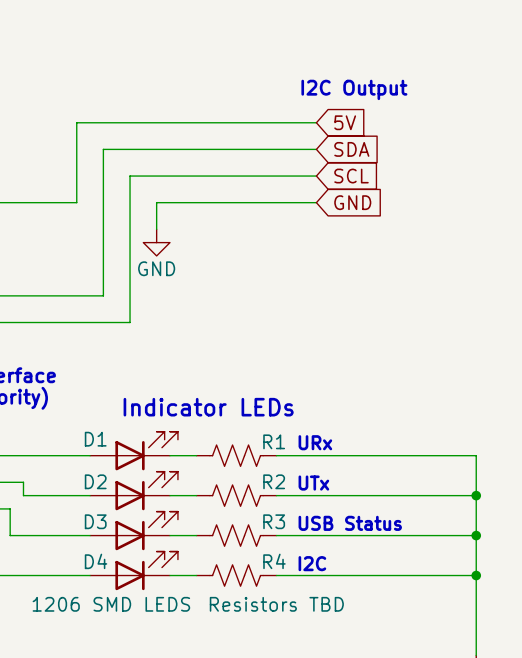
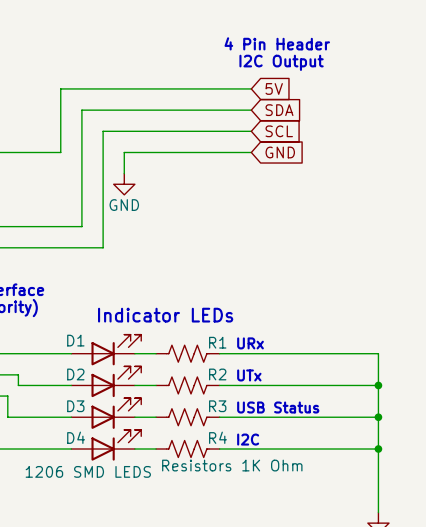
text: none -> 4 Pin Header (277, 43)
R1 value: Resistors TBD (276, 604) -> Resistors 1K Ohm (232, 465)

